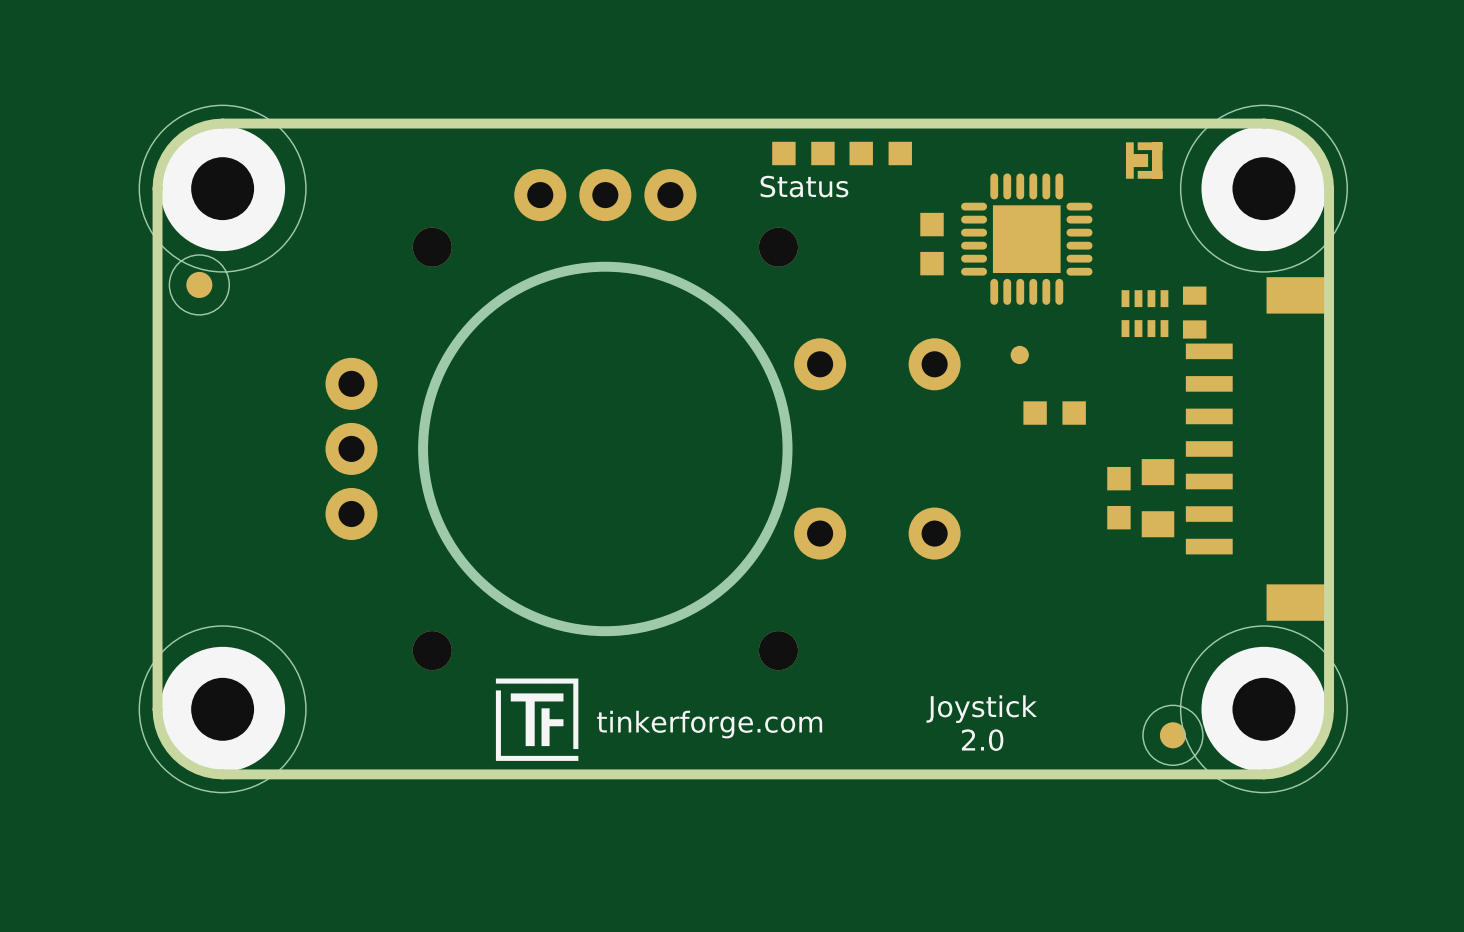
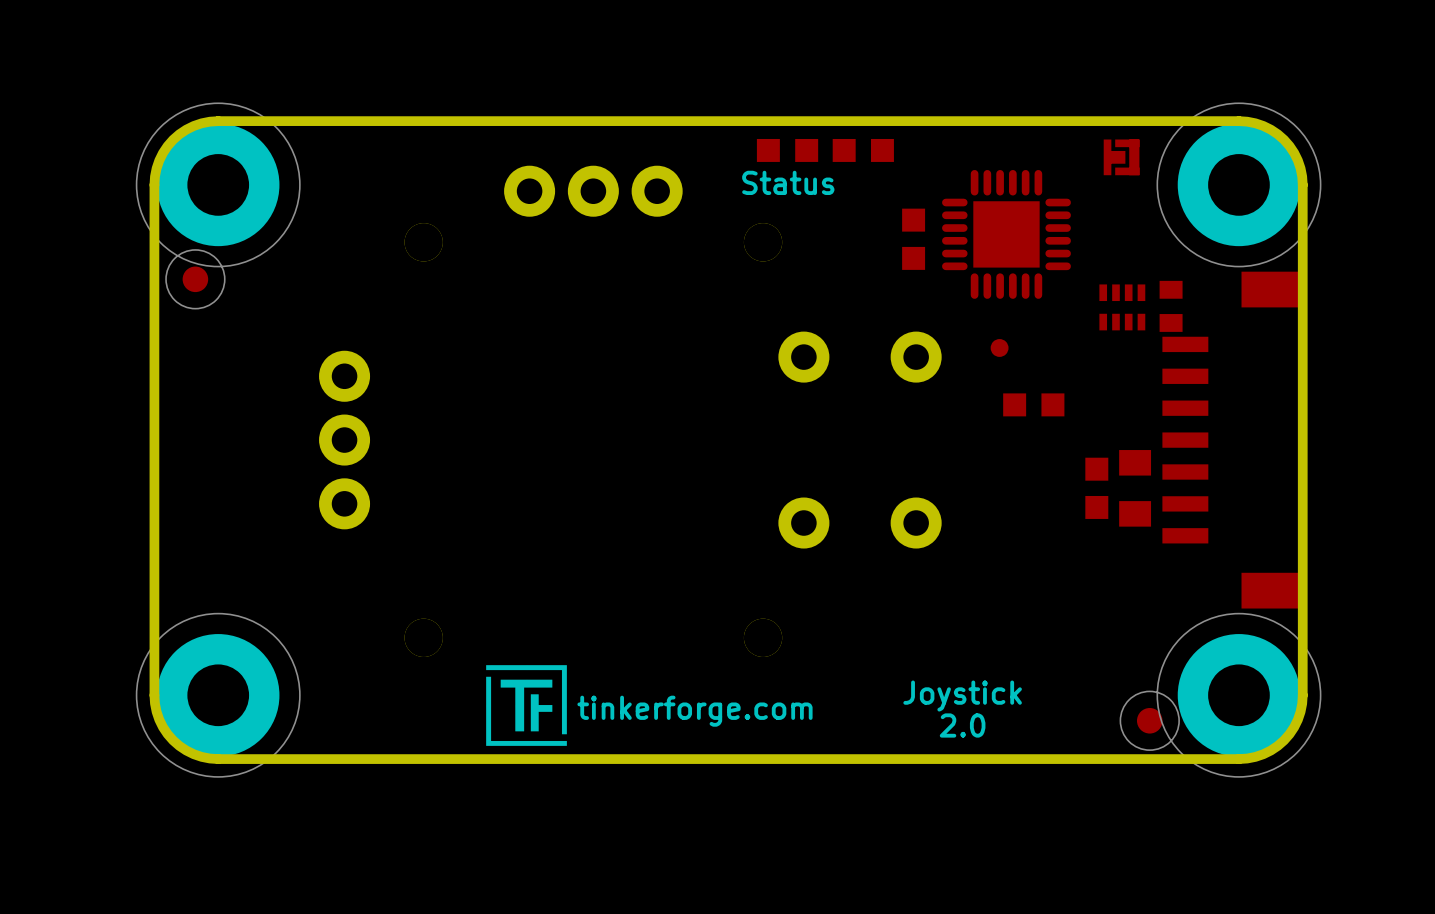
drawing: [418, 261, 793, 637] -> none

